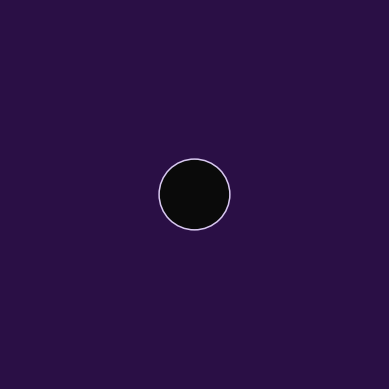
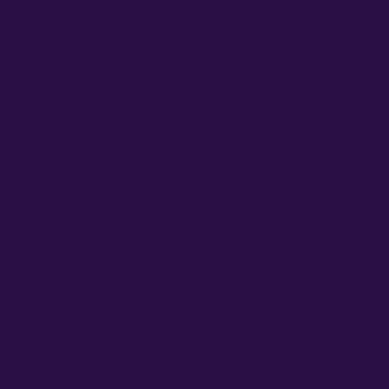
part: (194, 194) -> none

